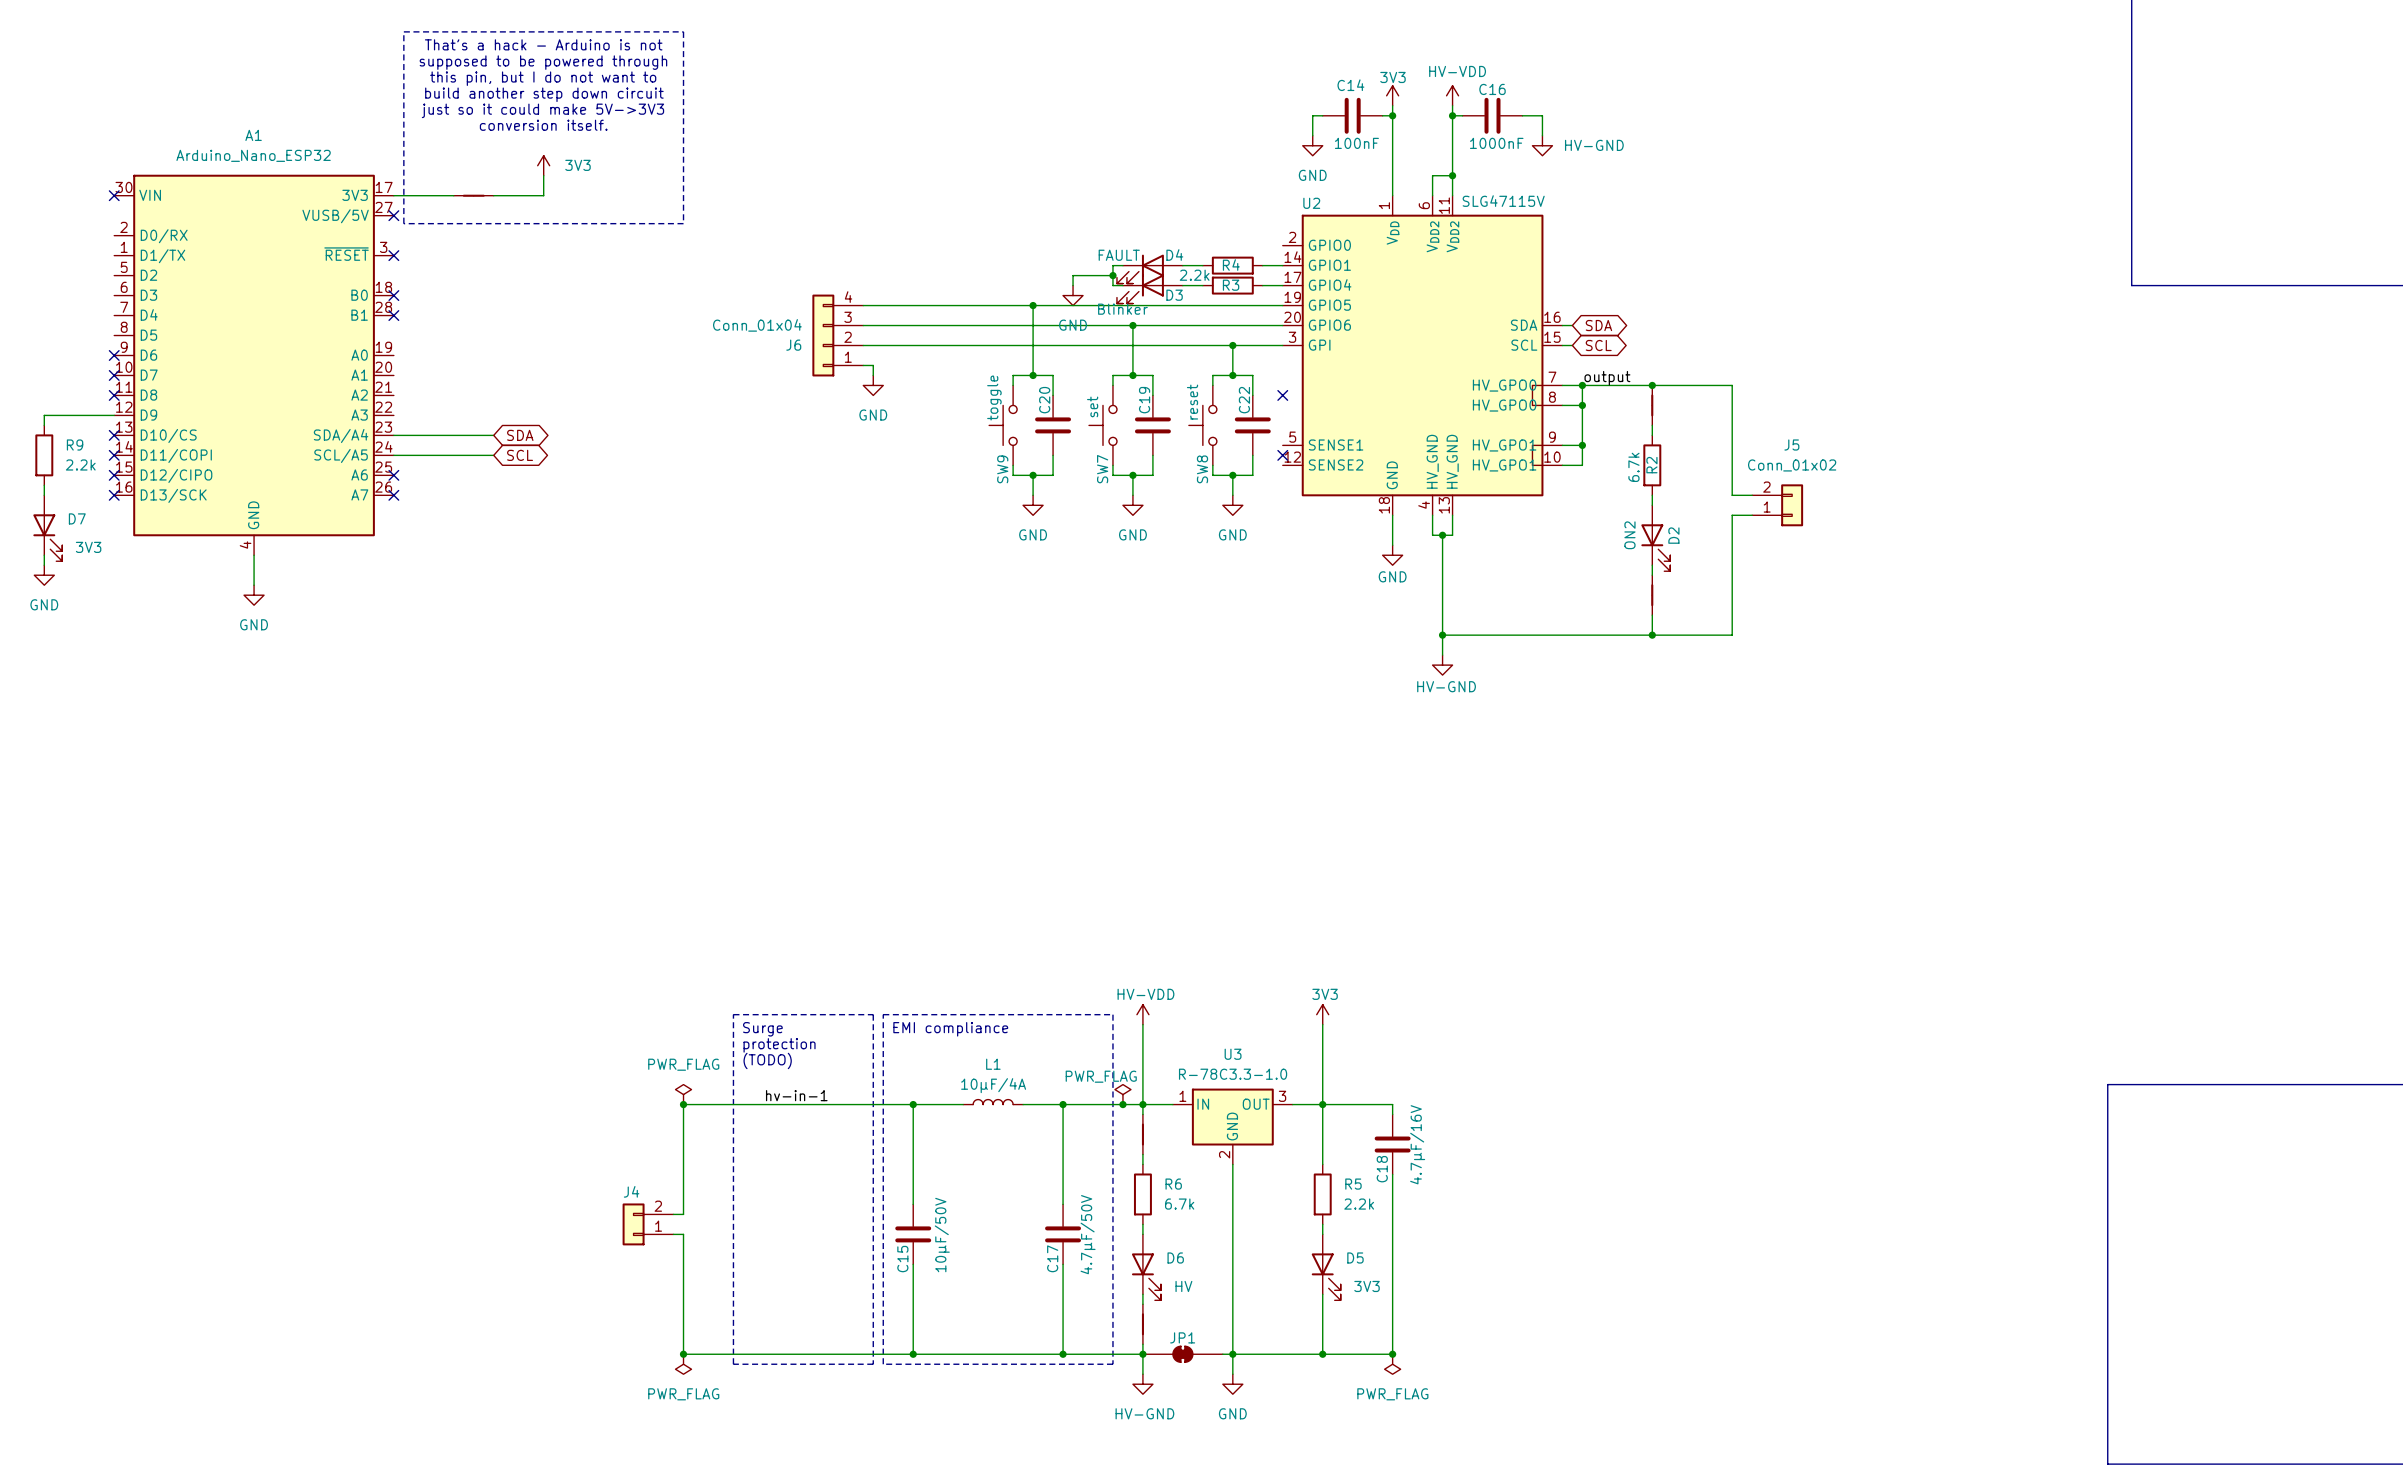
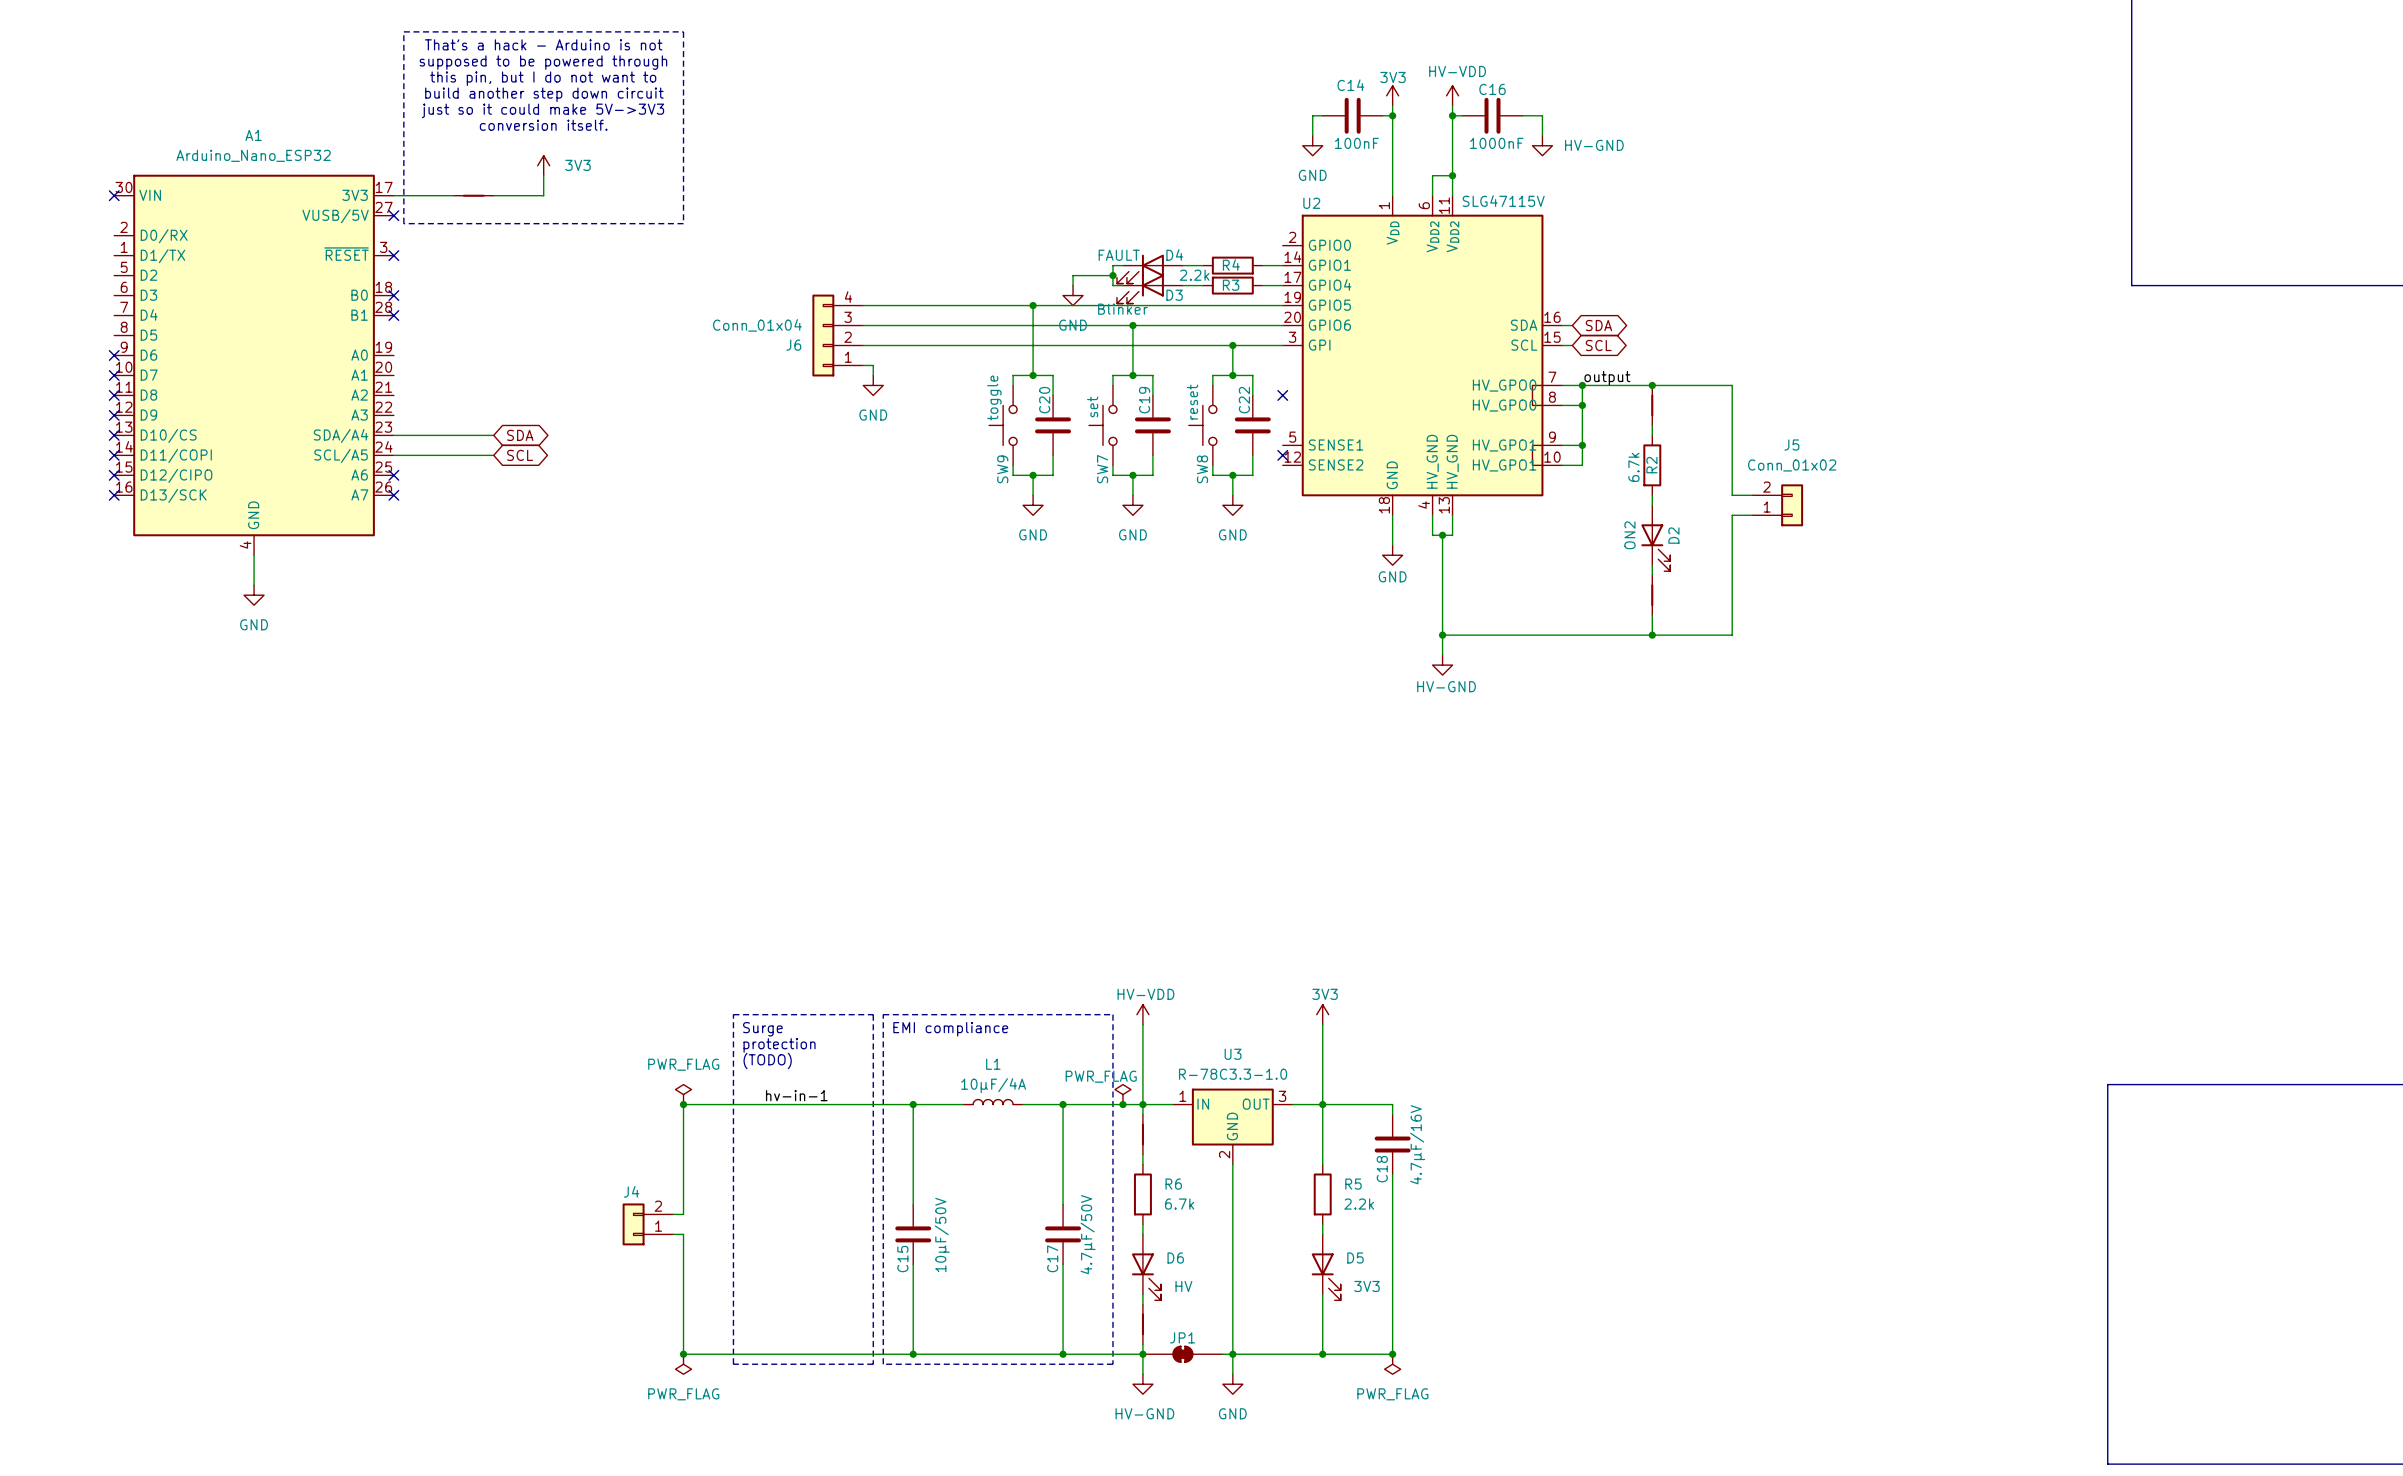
wire: (114, 415) (44, 415) (44, 425) -> none
no-connect mark: none -> (114, 415)
R9: 2.2k (44, 455) -> none
wire: (44, 485) (44, 495) -> none
D7: 3V3 (47, 528) -> none
wire: (44, 555) (44, 565) -> none
power symbol: GND (44, 575) -> none

